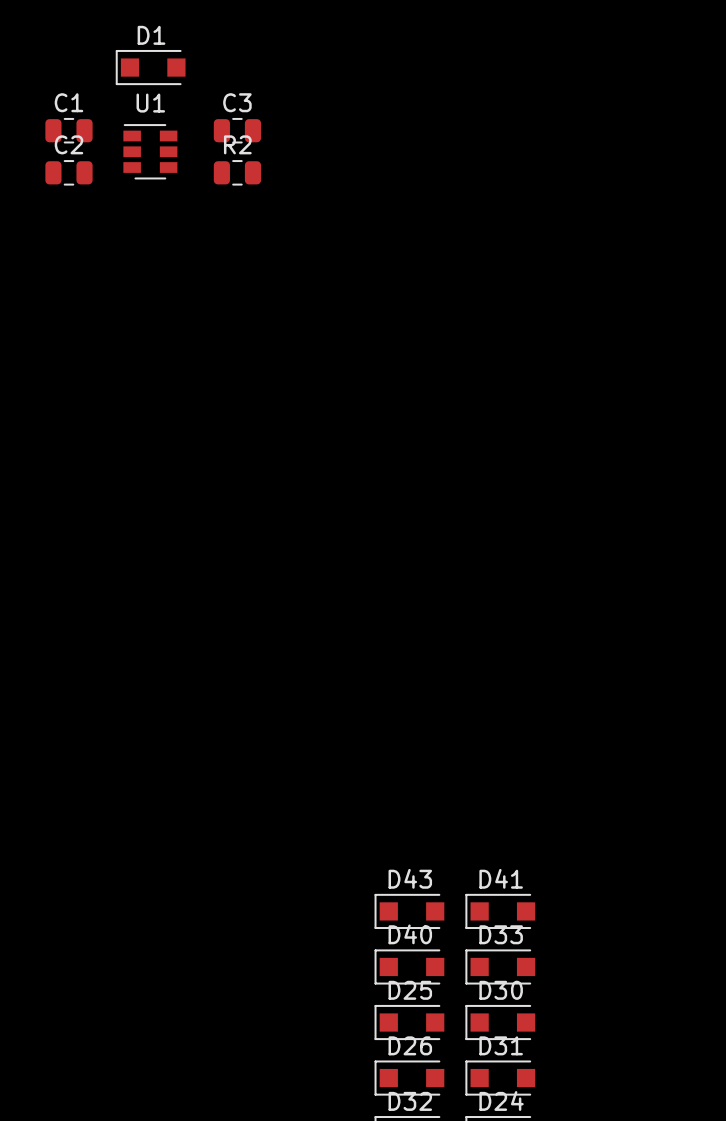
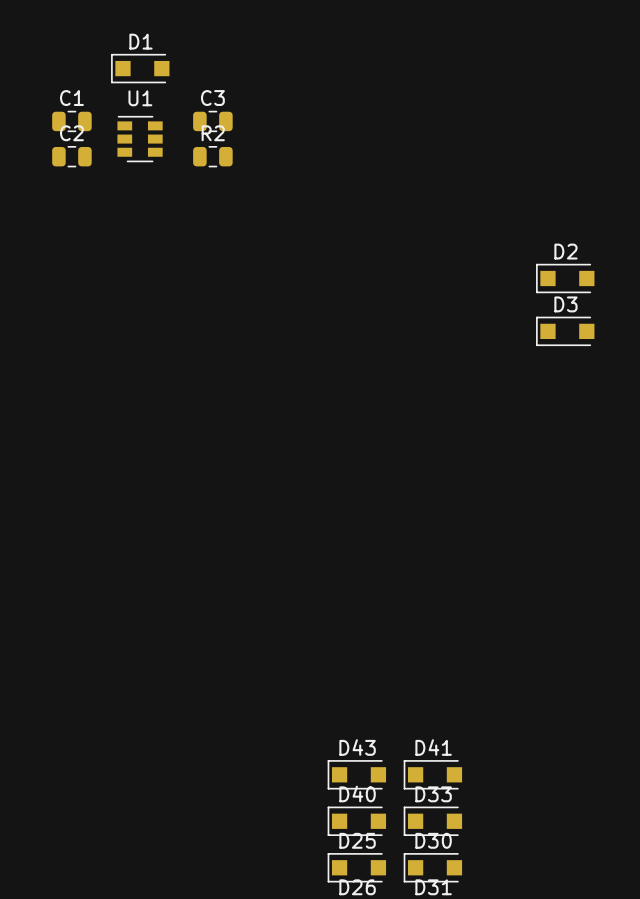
D2: none -> (565, 278)
D3: none -> (565, 331)

